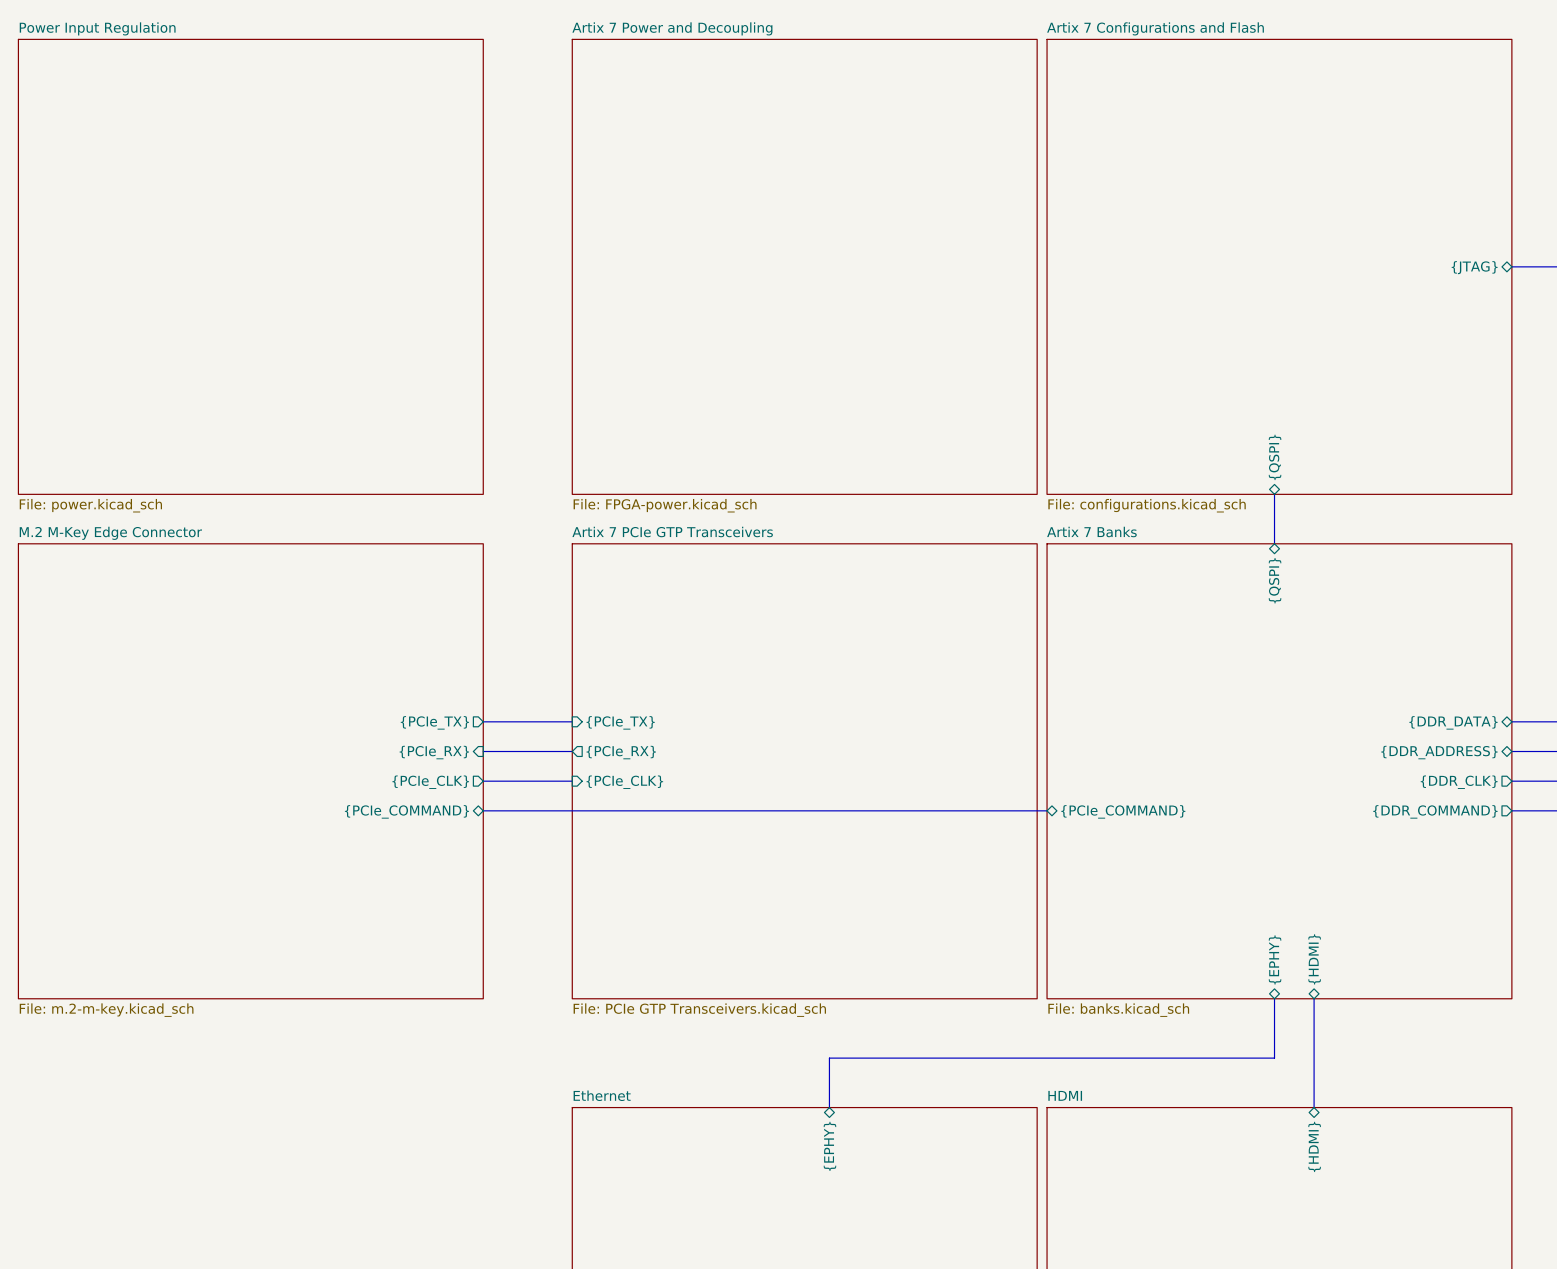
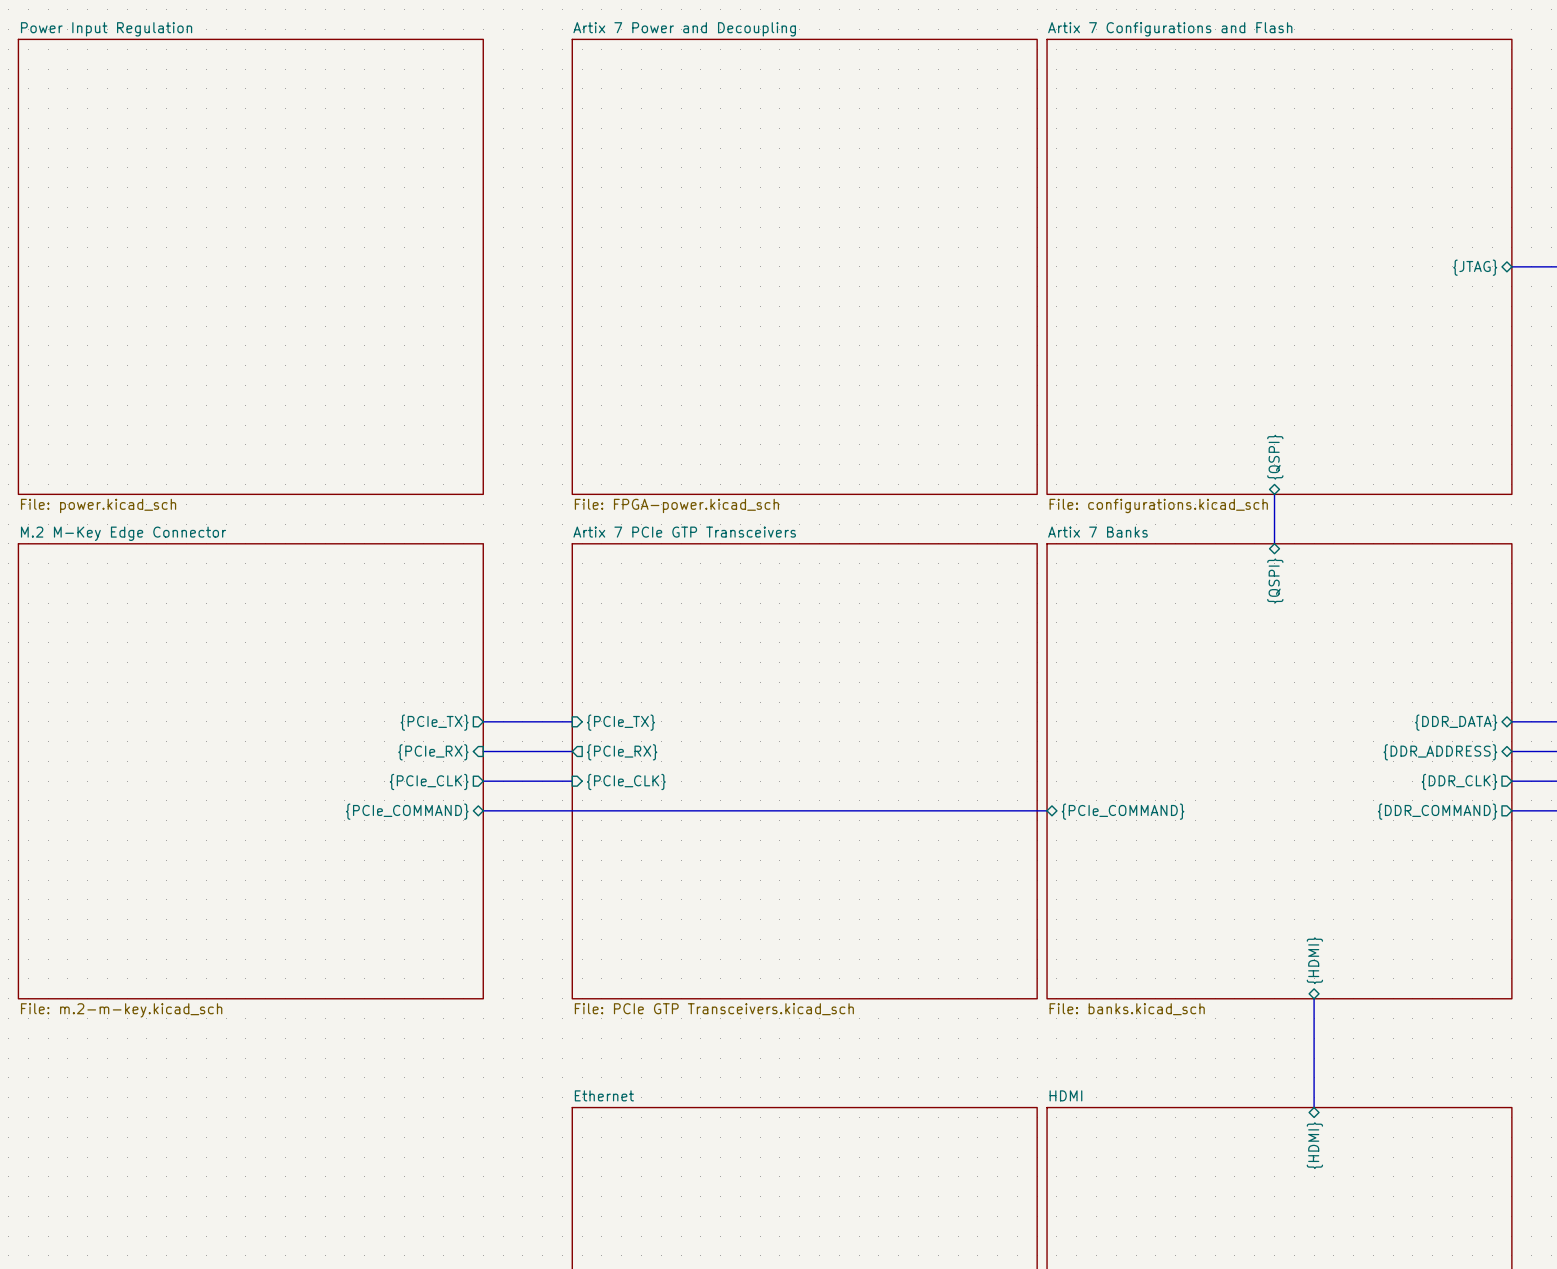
sheet pin: {EPHY} (1275, 959) -> none
bus: (1274, 998) (1274, 1058) (829, 1058) (829, 1107) -> none
sheet pin: {EPHY} (829, 1146) -> none

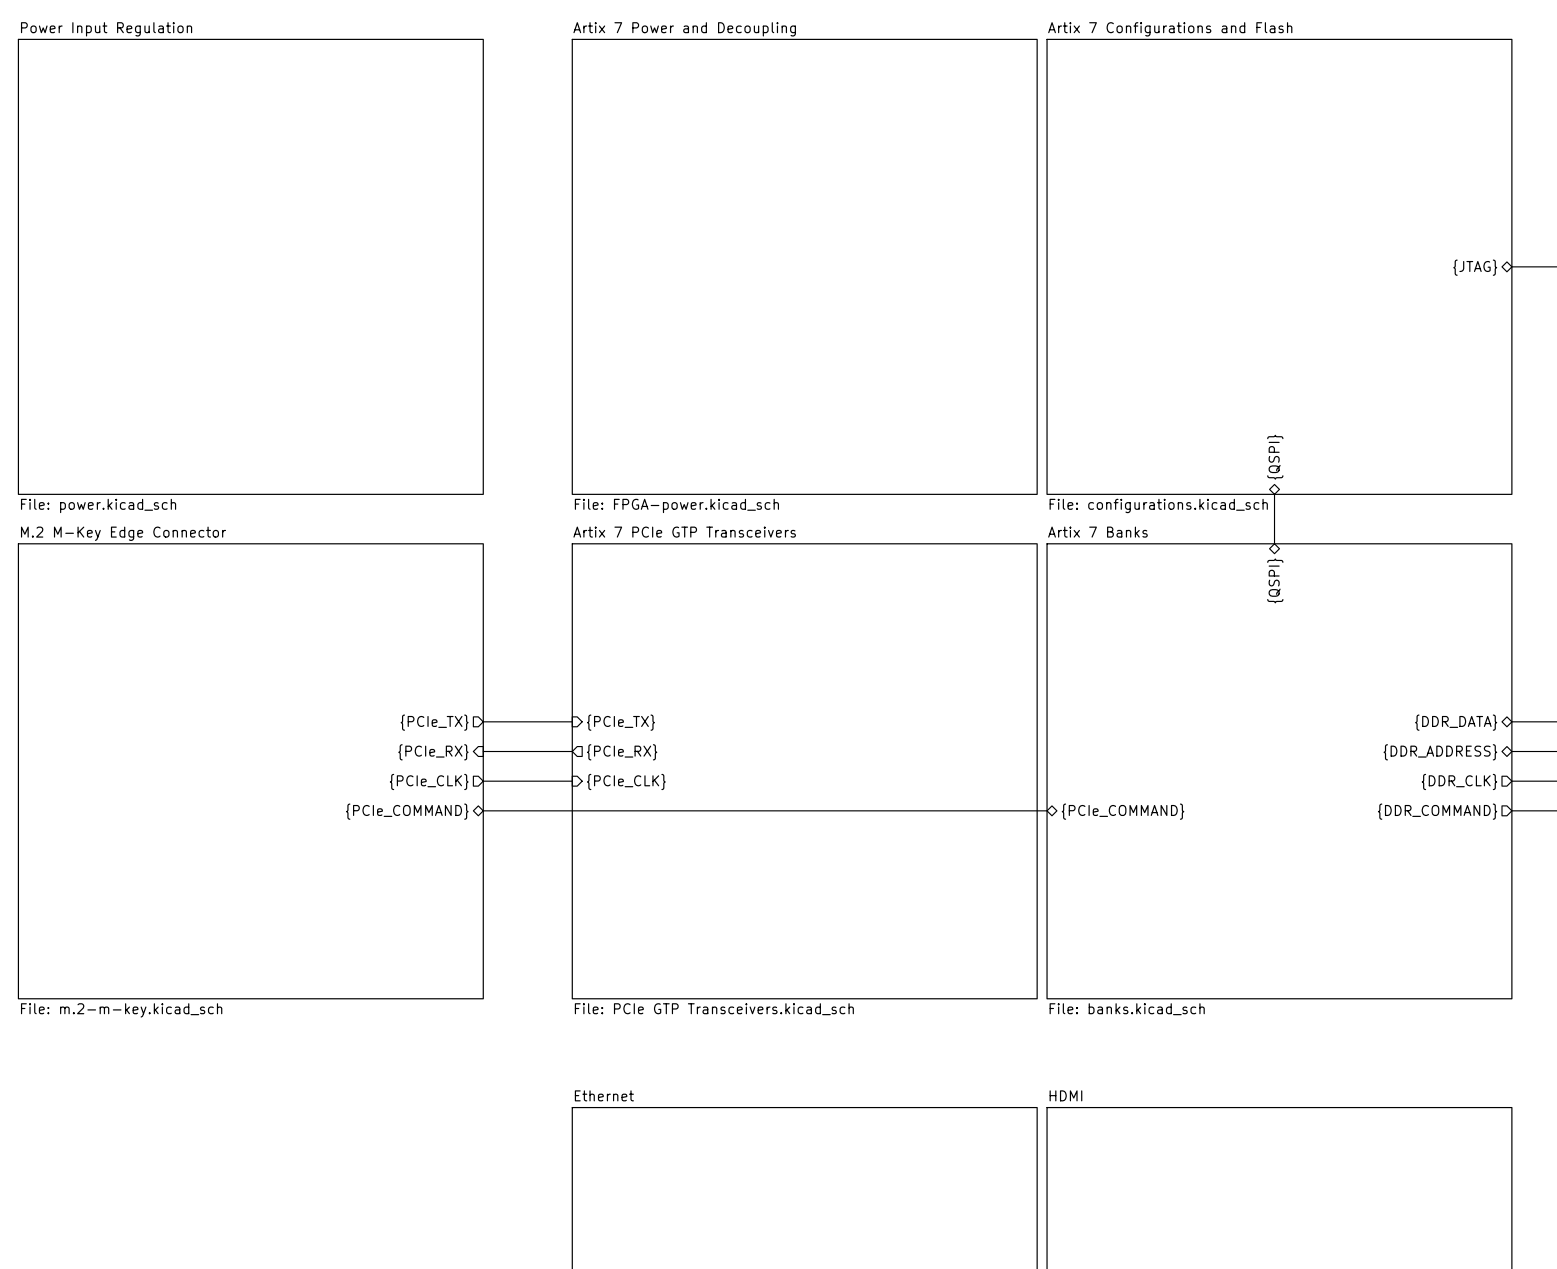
sheet pin: {HDMI} (1314, 960) -> none
bus: (1314, 998) (1314, 1107) -> none
sheet pin: {HDMI} (1314, 1145) -> none

